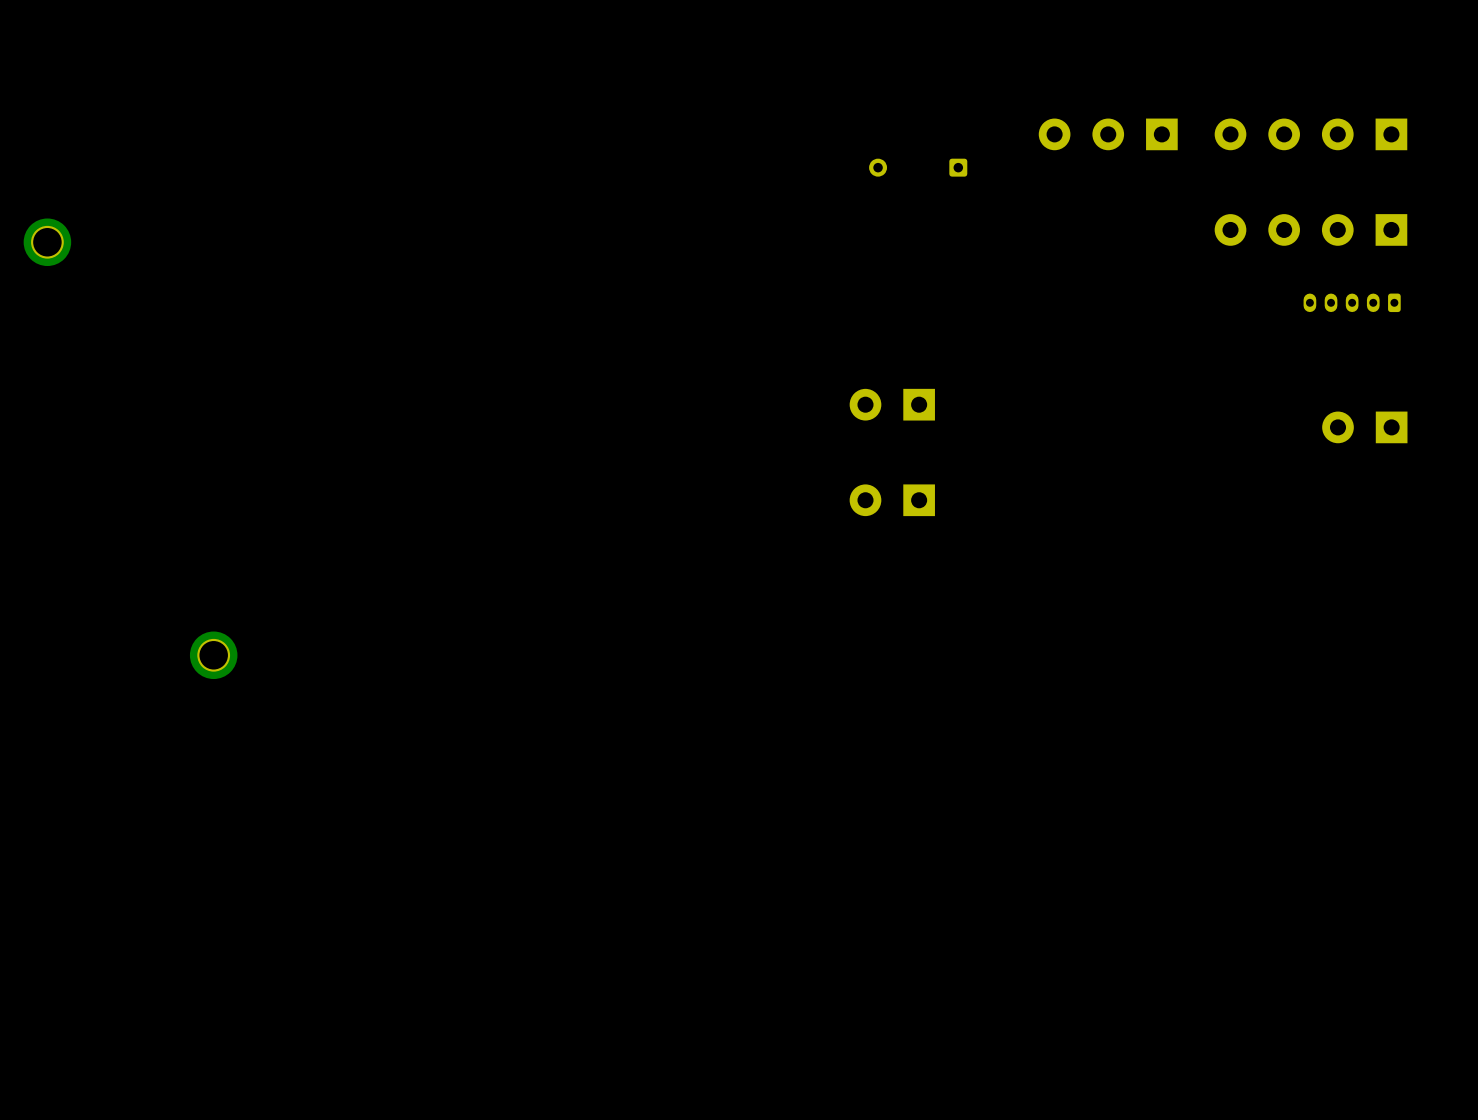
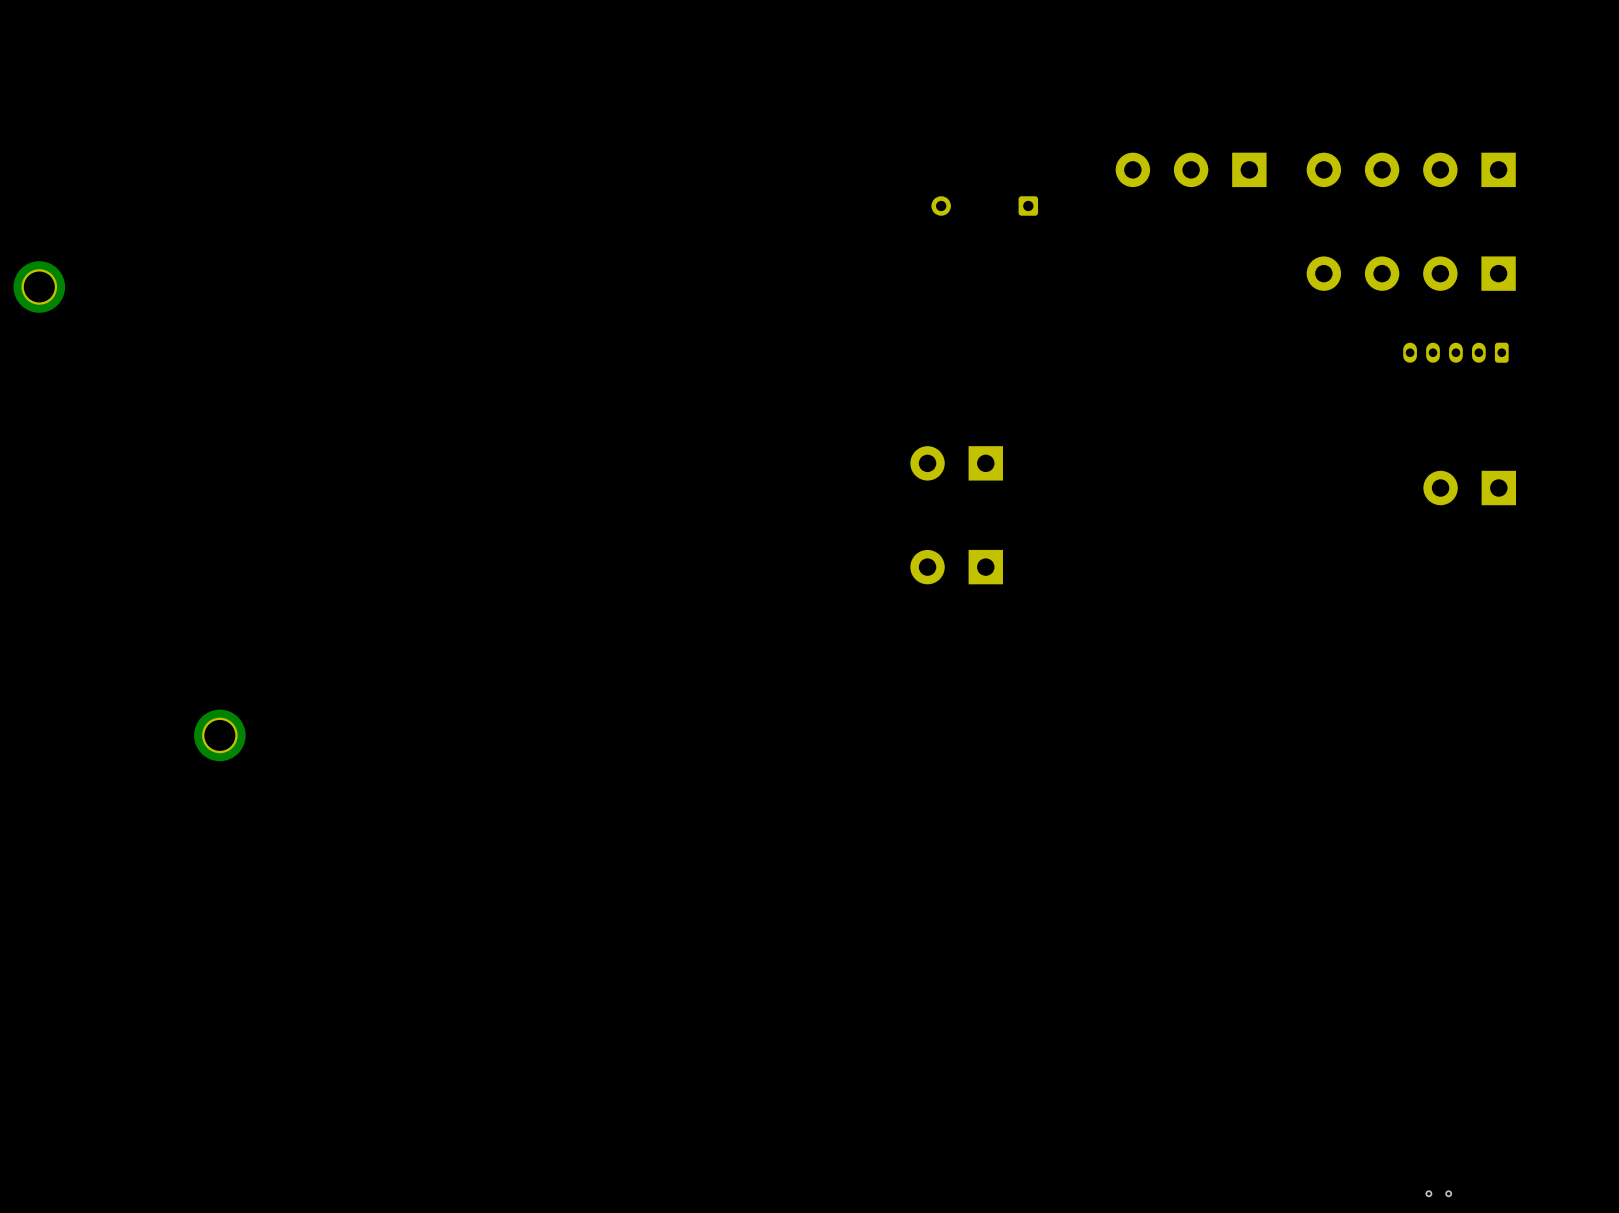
via: none -> (1428, 1193)
via: none -> (1448, 1193)

